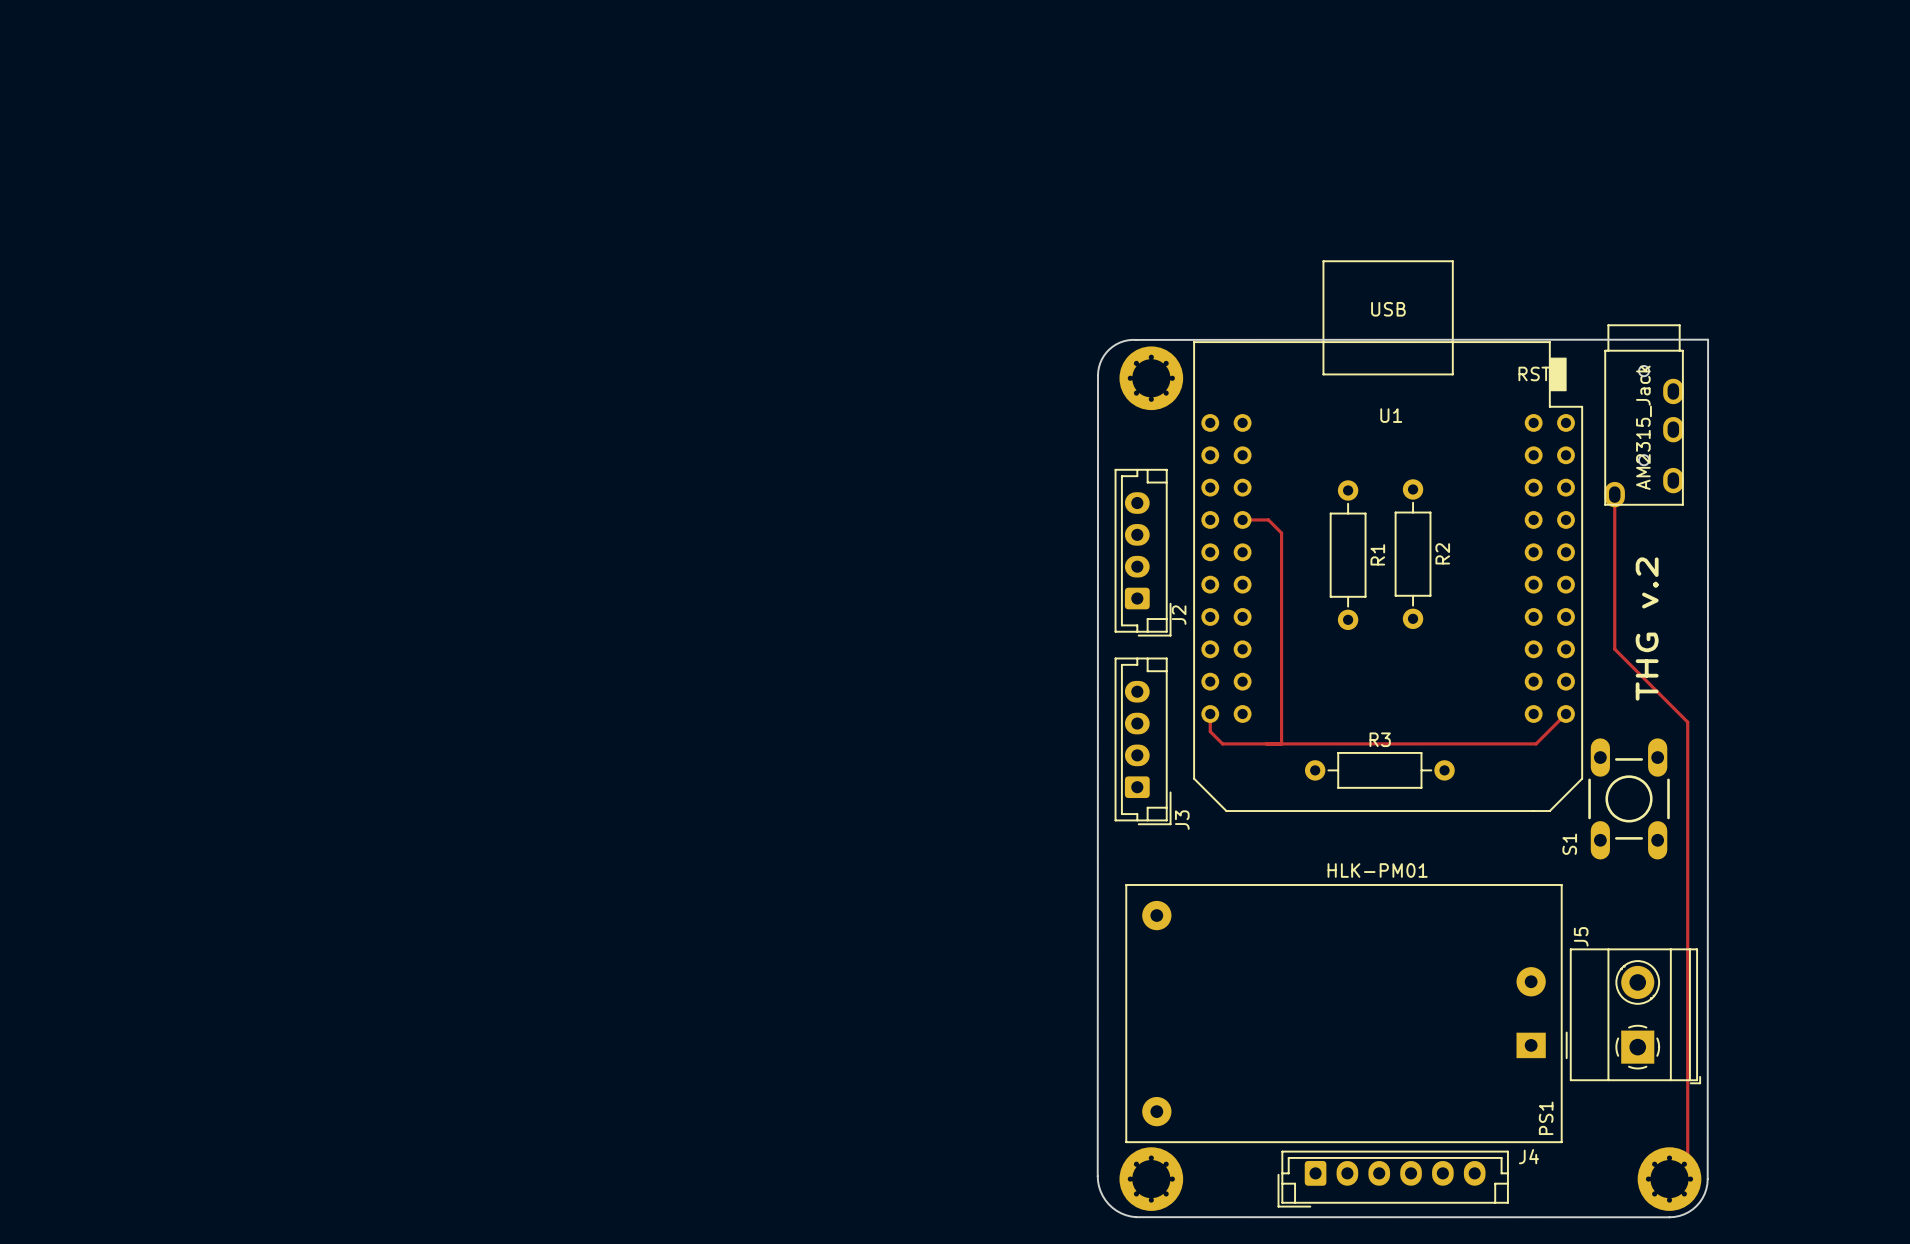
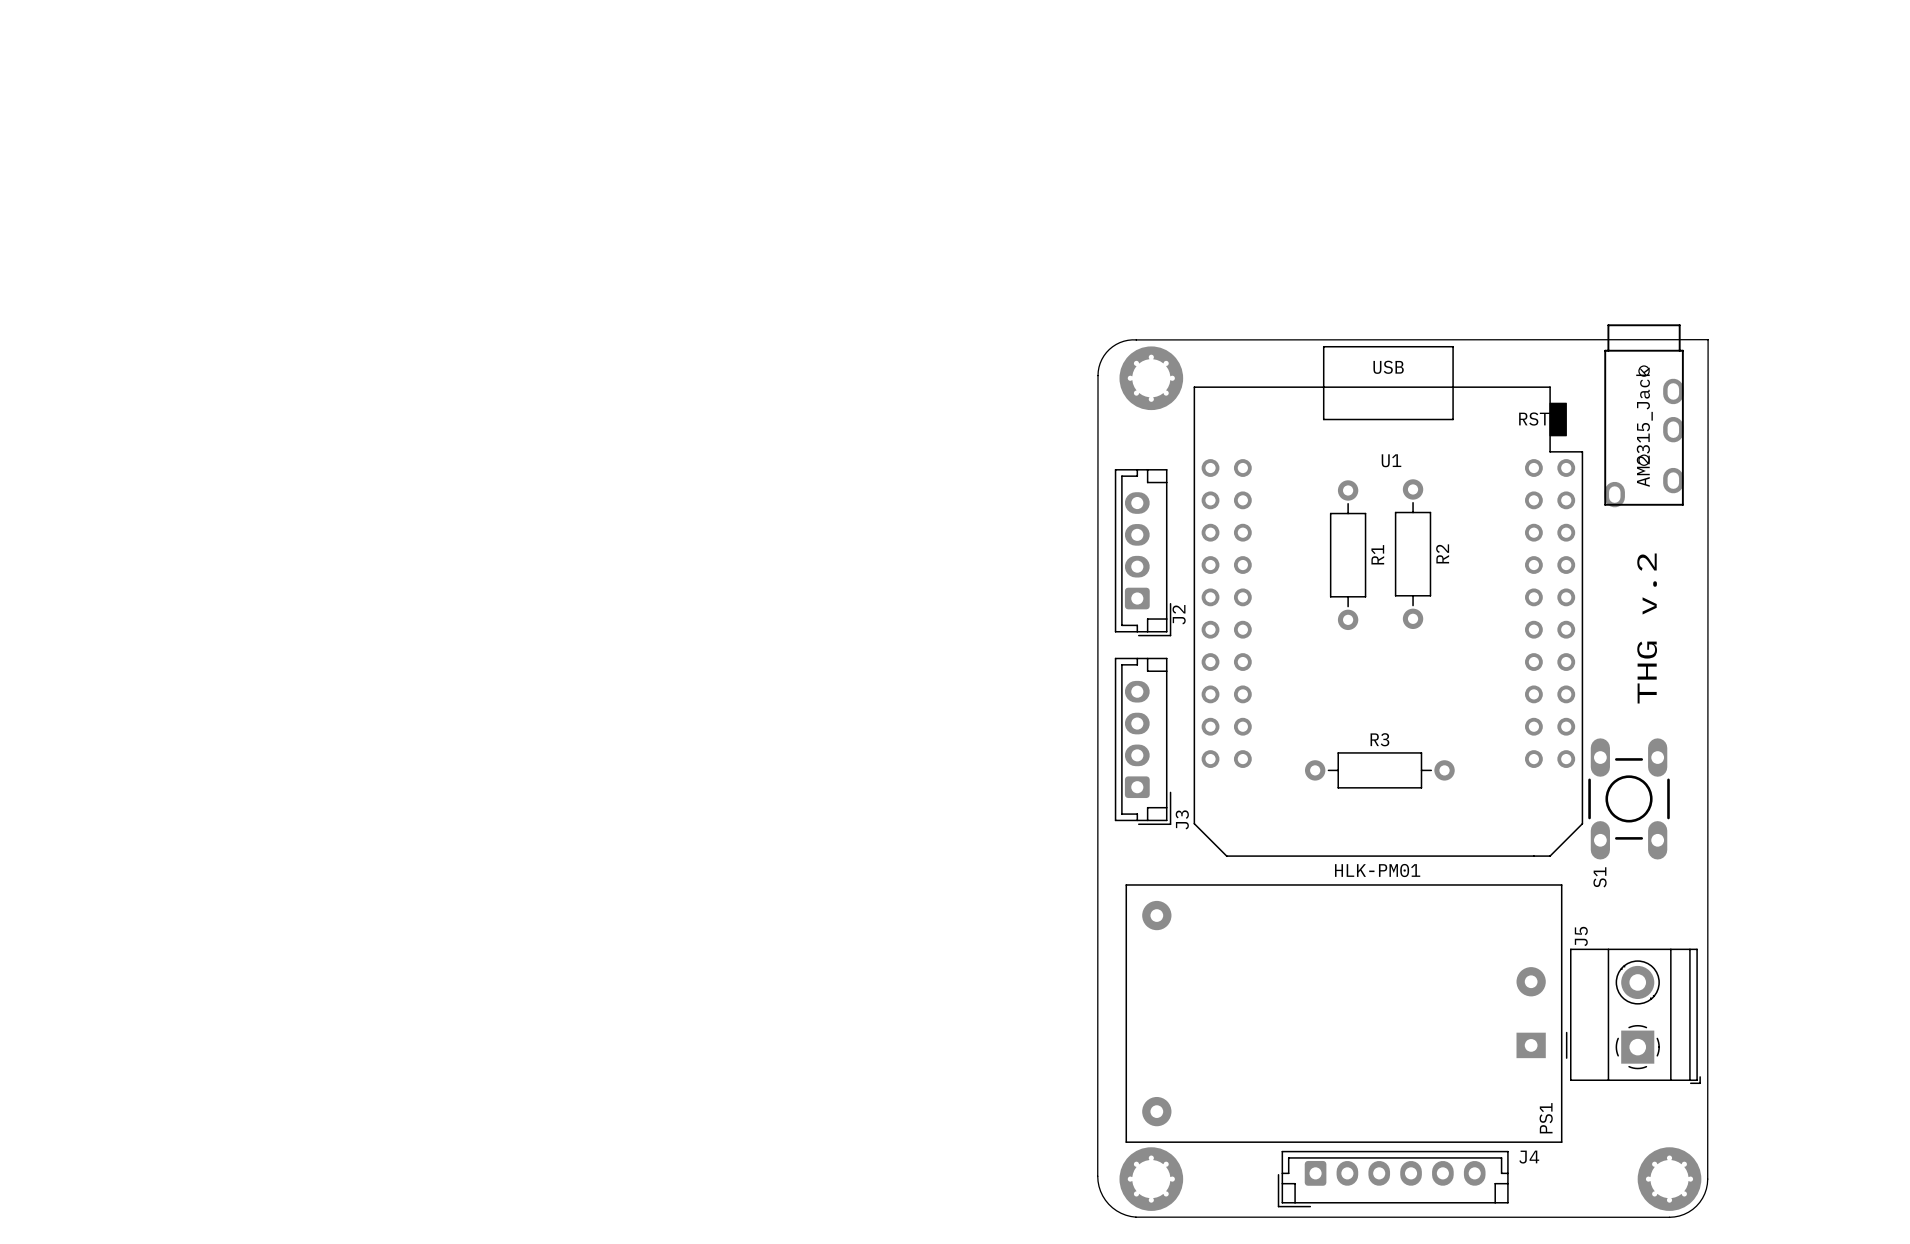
U1 footprint: [1193, 260, 1583, 812] -> [1193, 345, 1584, 857]
track: (1614, 494) (1614, 649) (1687, 722) (1687, 1160) -> none
track: (1242, 519) (1268, 519) (1281, 533) (1281, 743) -> none
track: (1210, 714) (1210, 731) (1222, 743) (1536, 743) (1566, 714) -> none
S1 name position: S1 (1569, 844) -> S1 (1600, 877)

